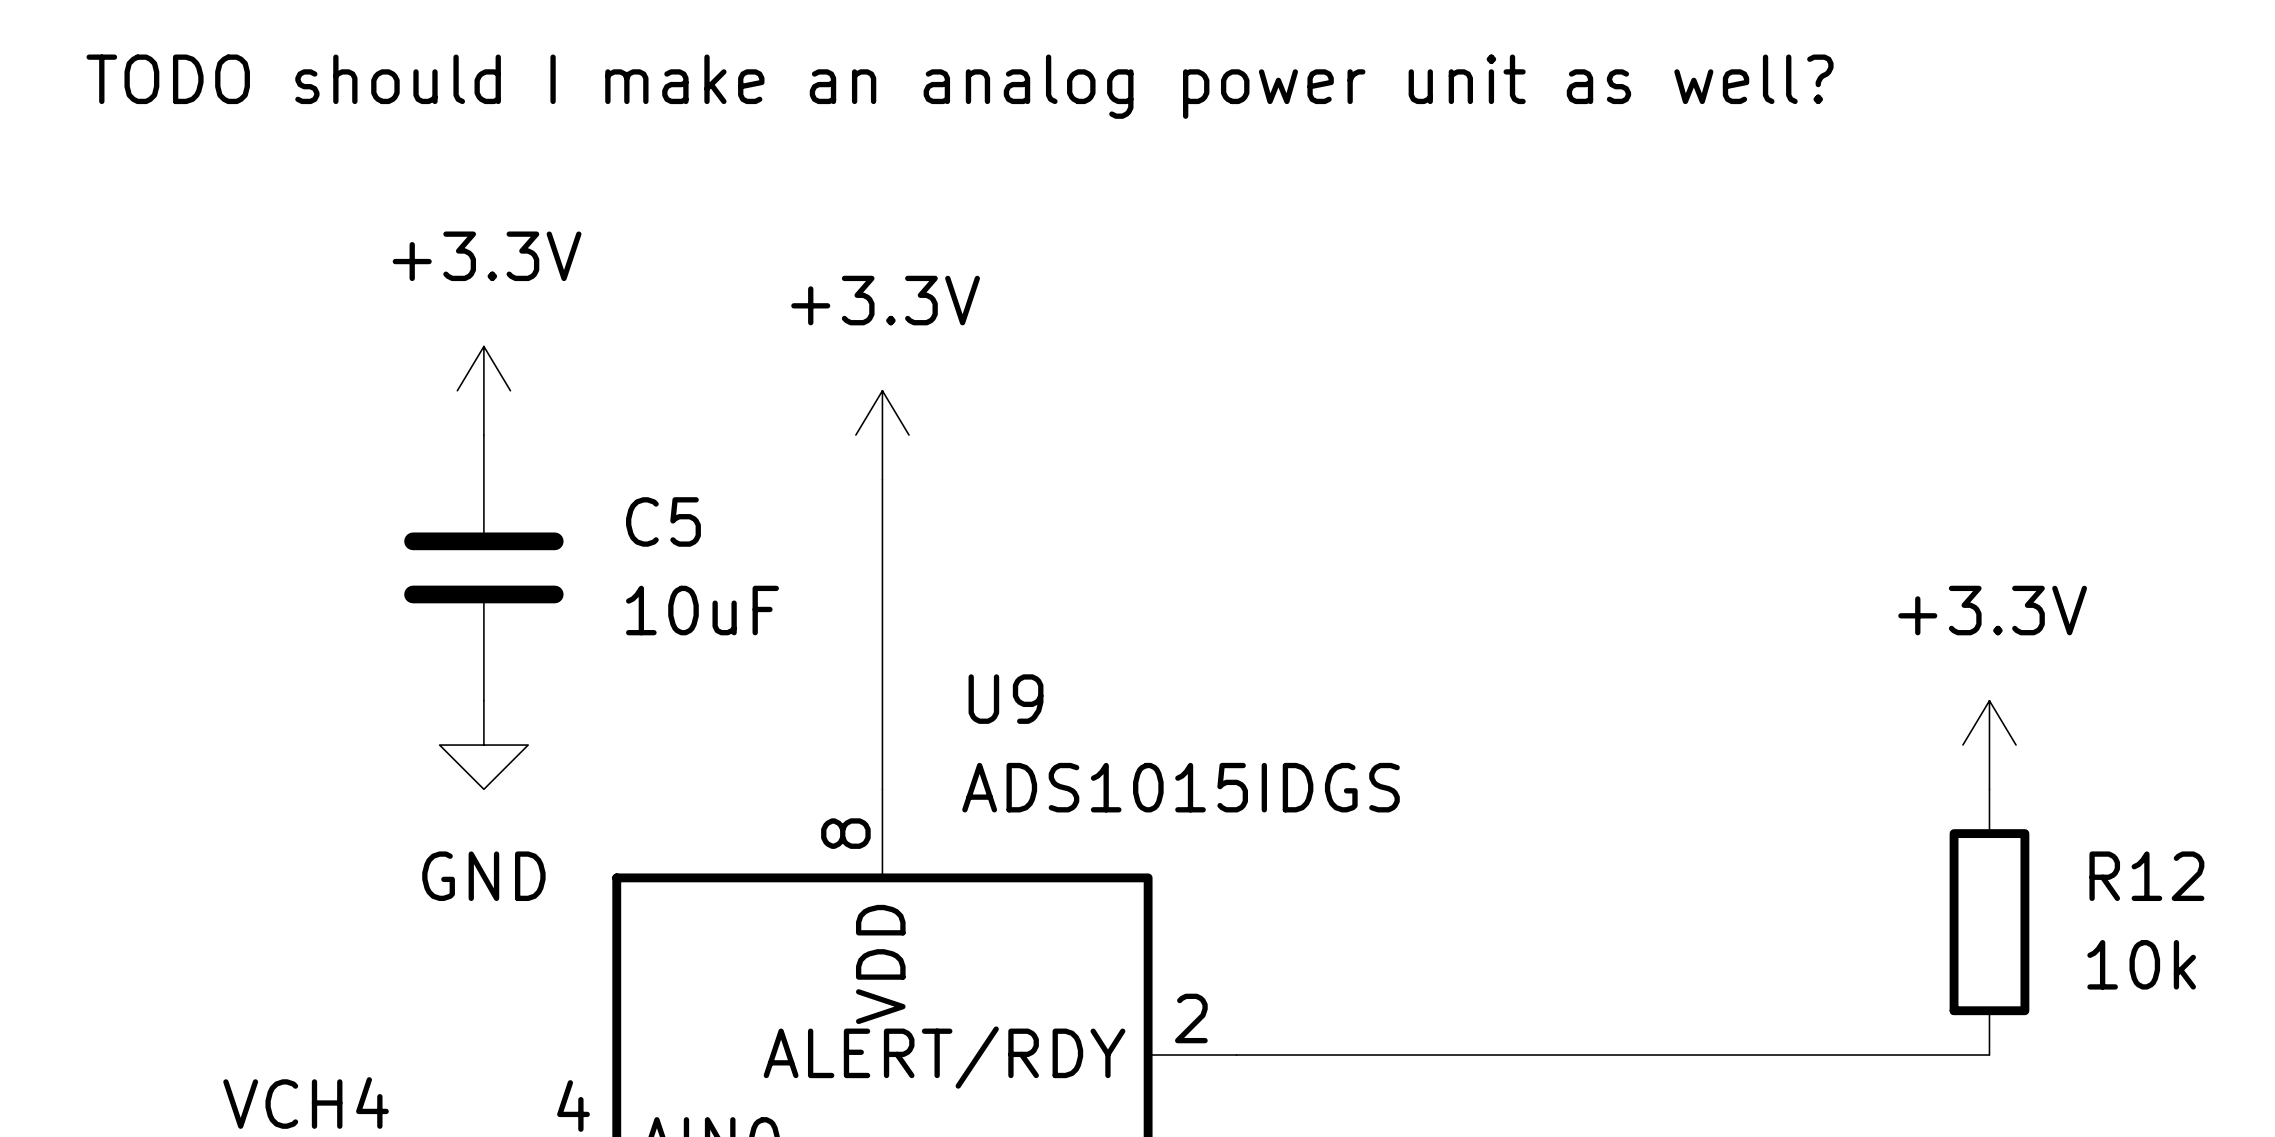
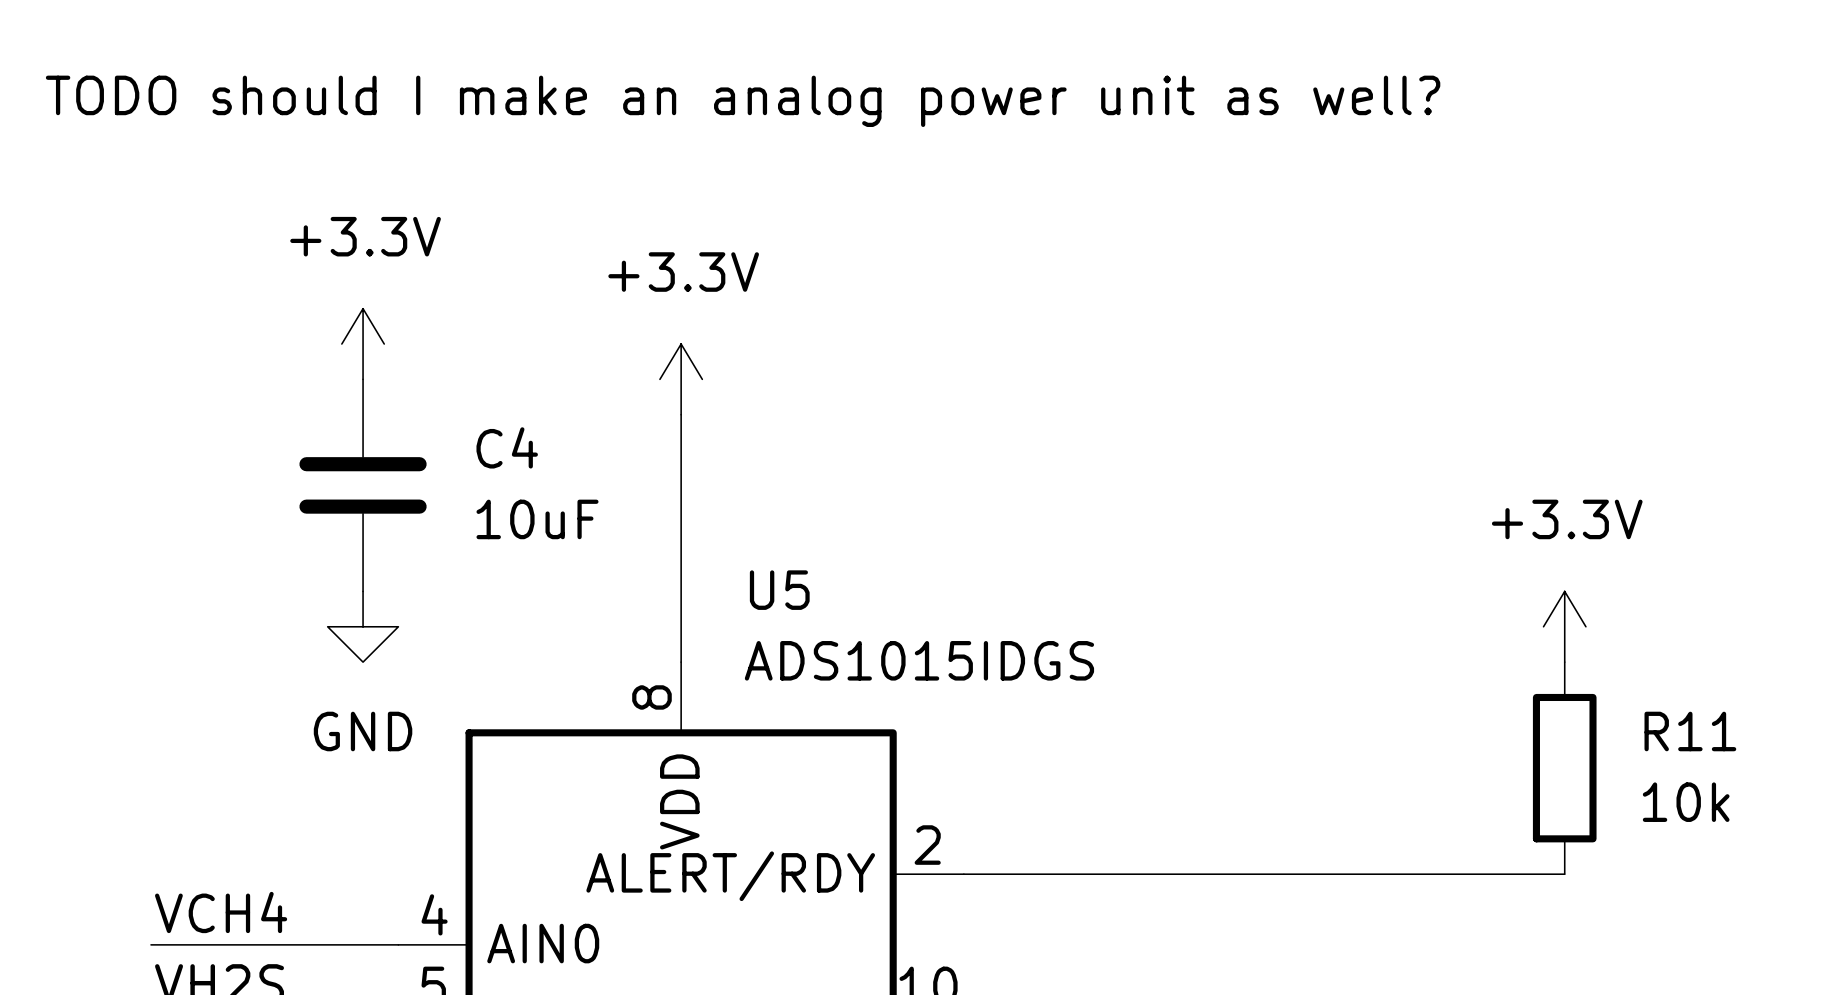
C5 name: C5 (663, 521) -> C4 (507, 447)
U9 name: U9 (1006, 699) -> U5 (779, 590)
R12 name: R12 (2146, 876) -> R11 (1690, 731)

